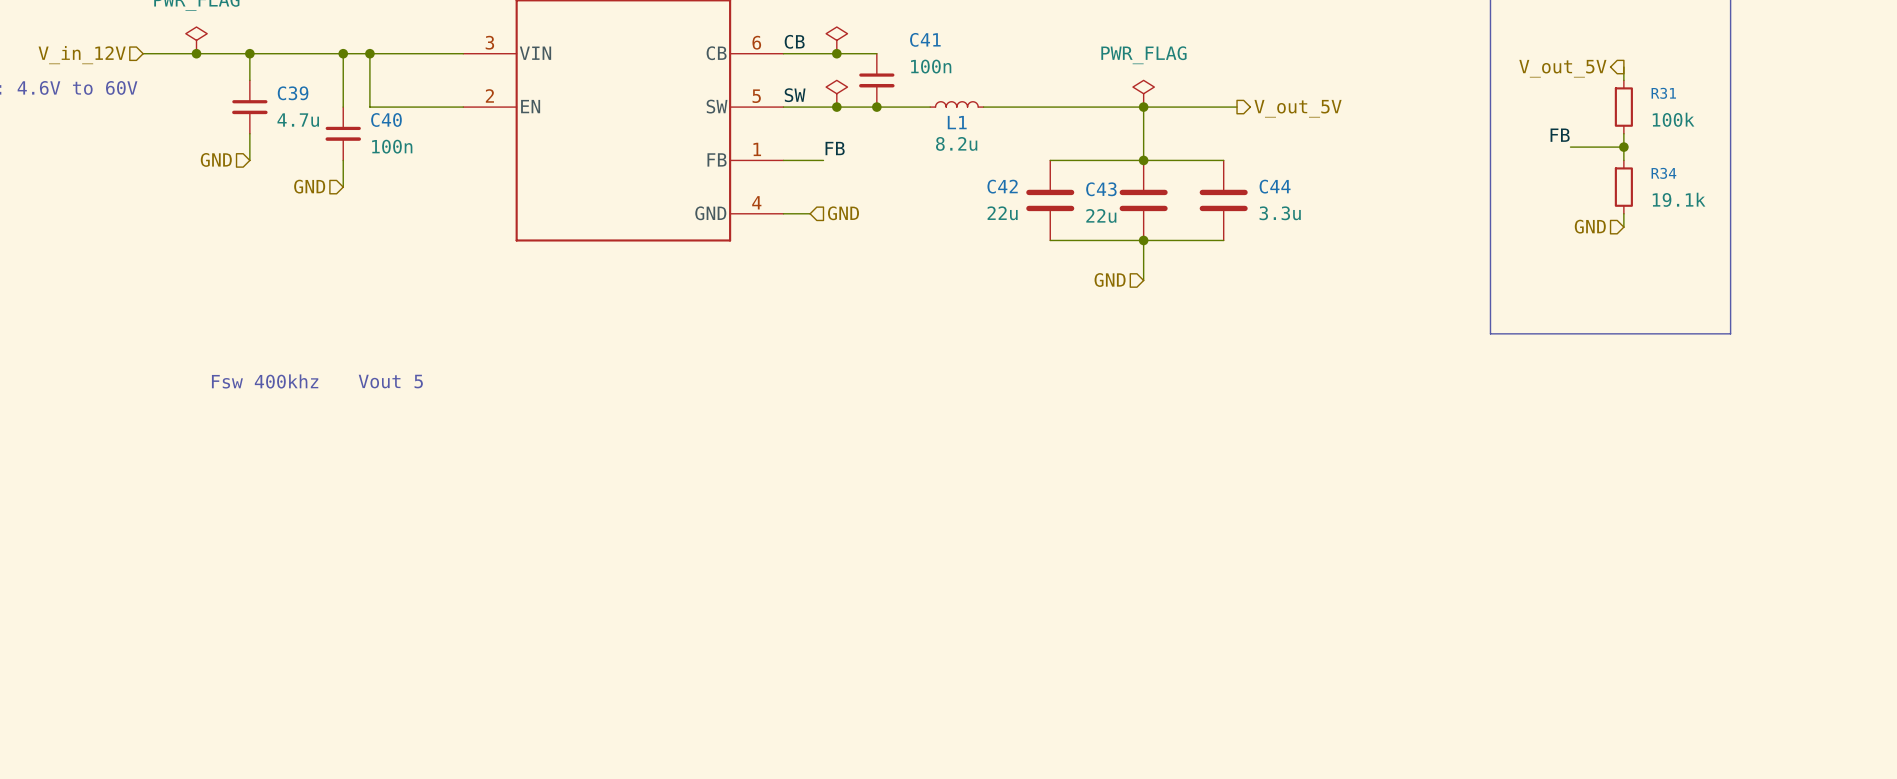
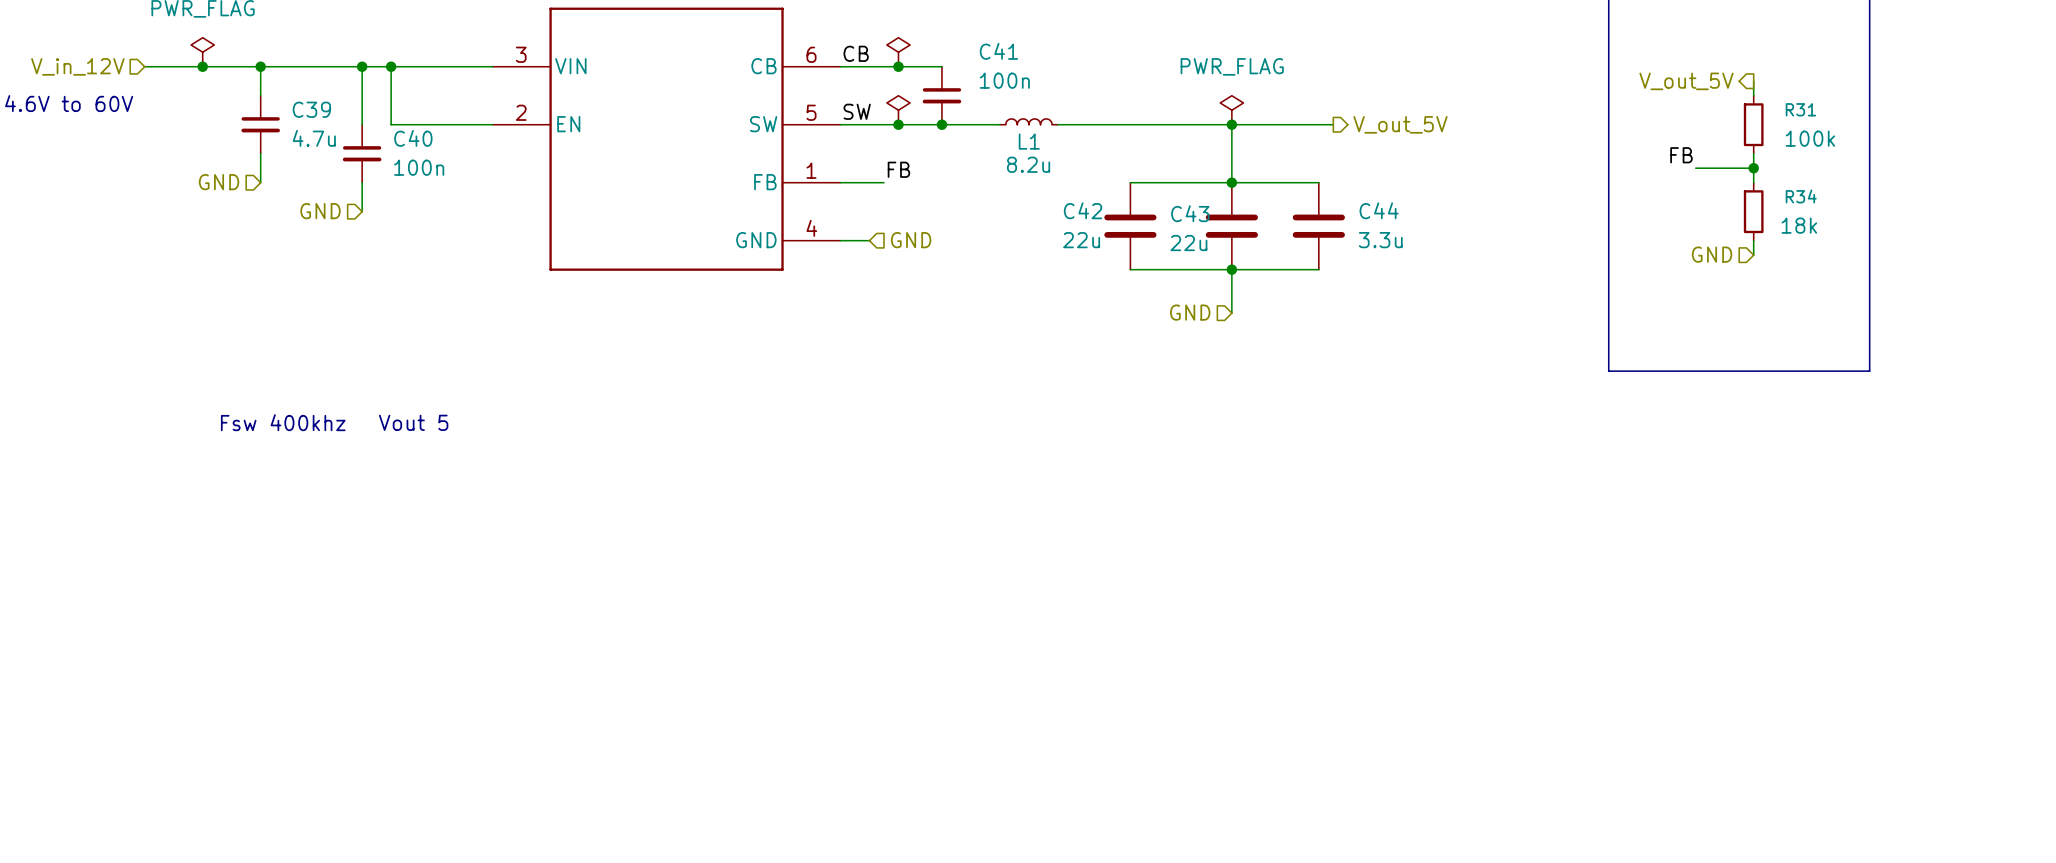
R34 value: 19.1k (1679, 199) -> 18k (1799, 225)

